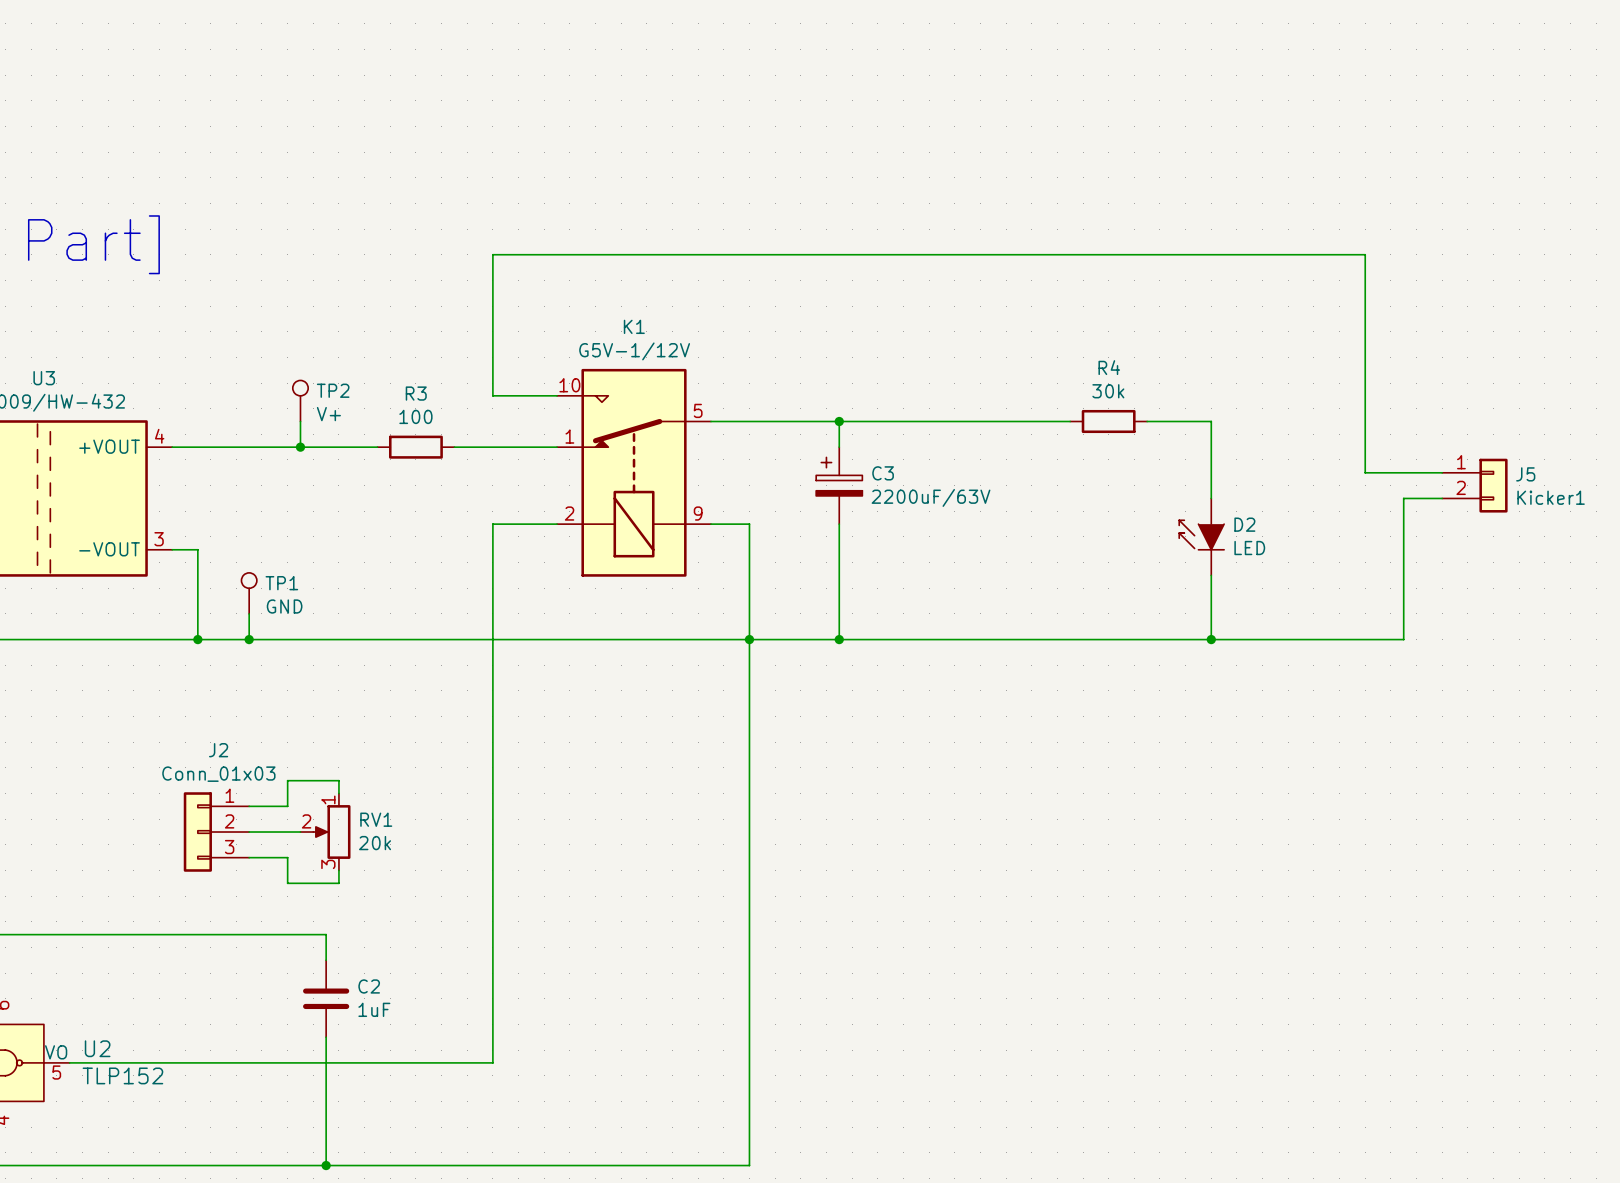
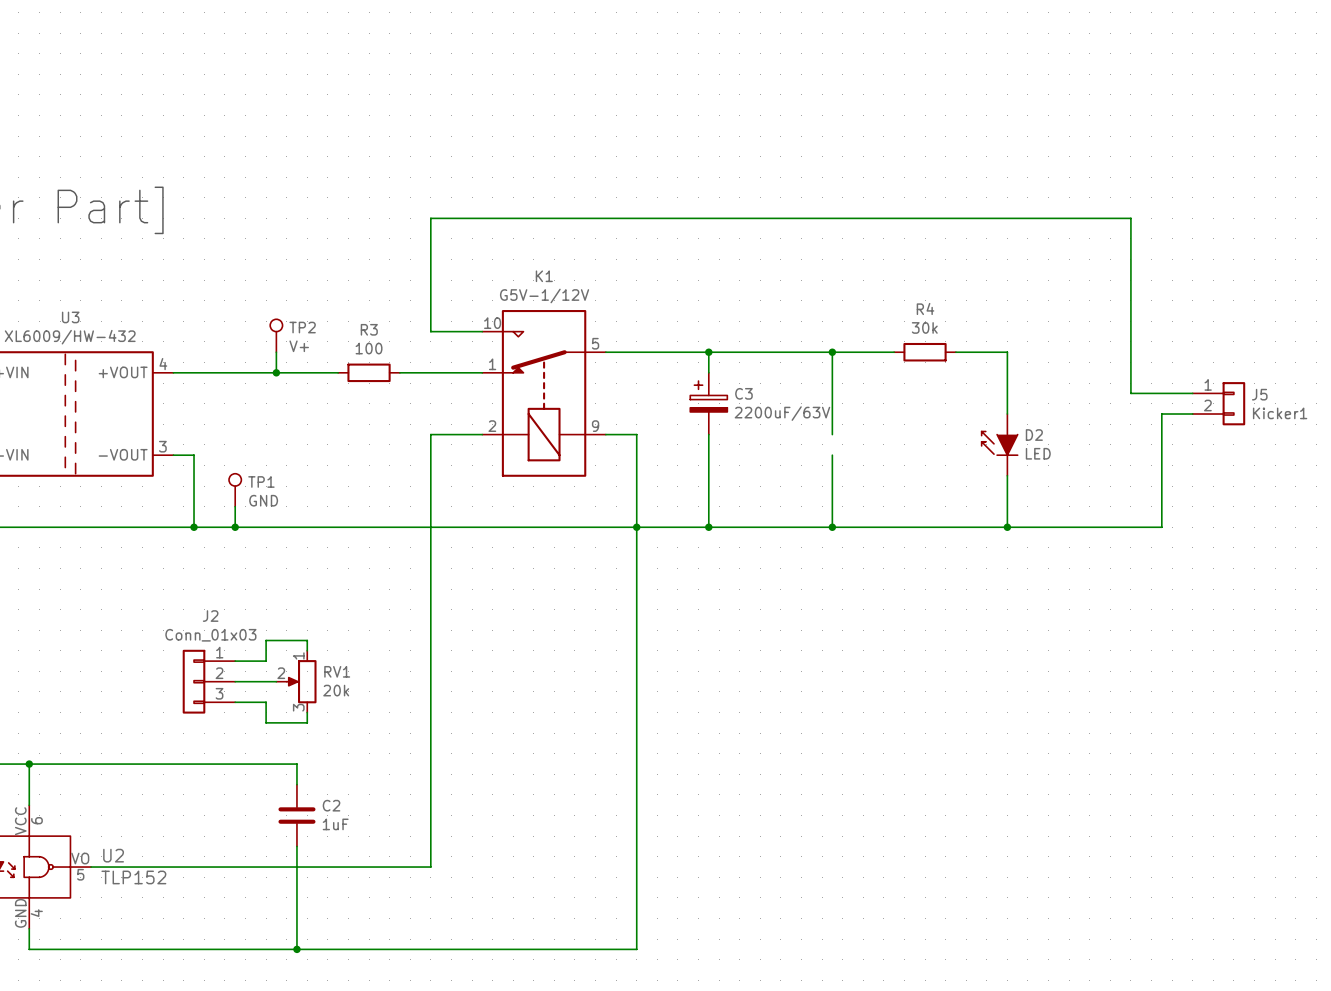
wire: none -> (832, 352) (832, 434)
junction: none -> (832, 352)
wire: none -> (832, 455) (832, 527)
junction: none -> (832, 527)

